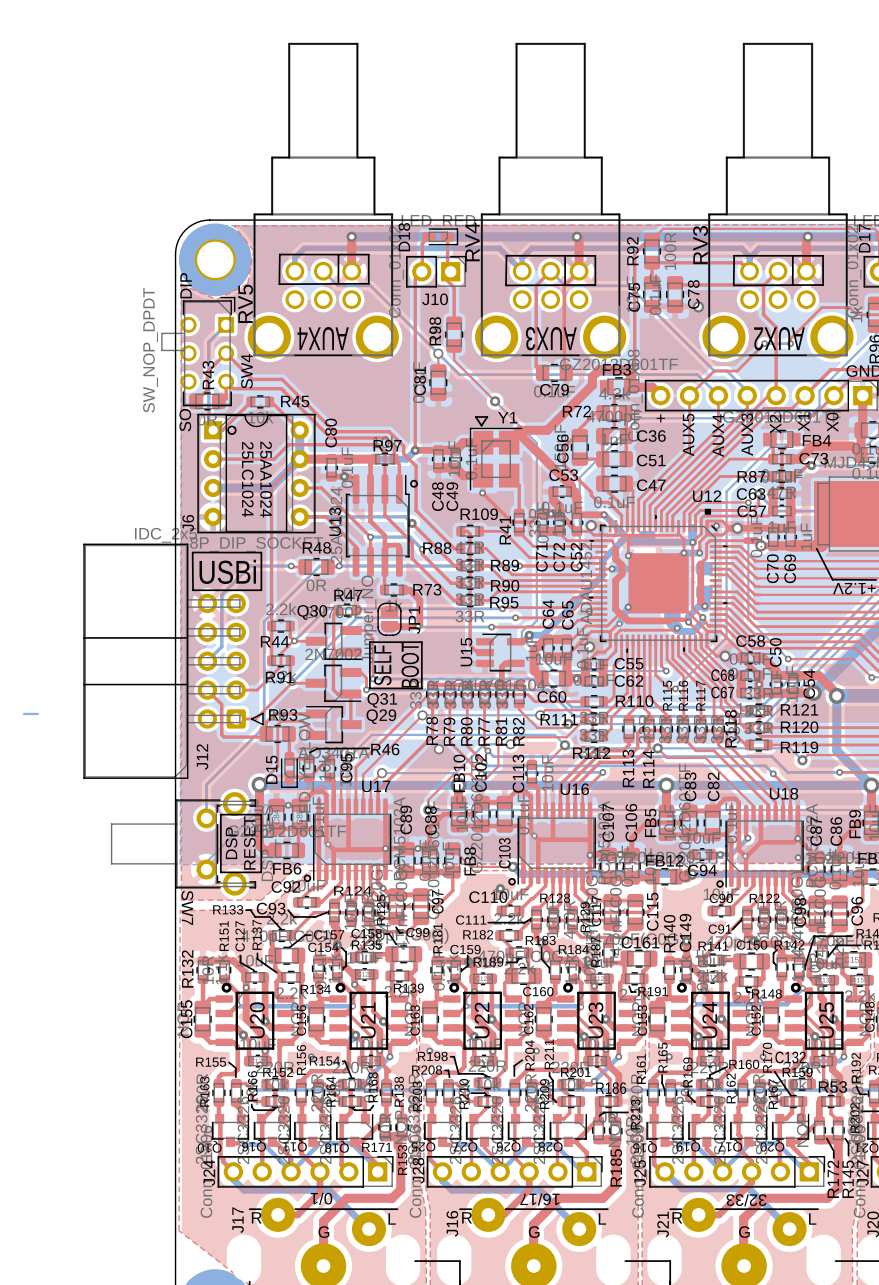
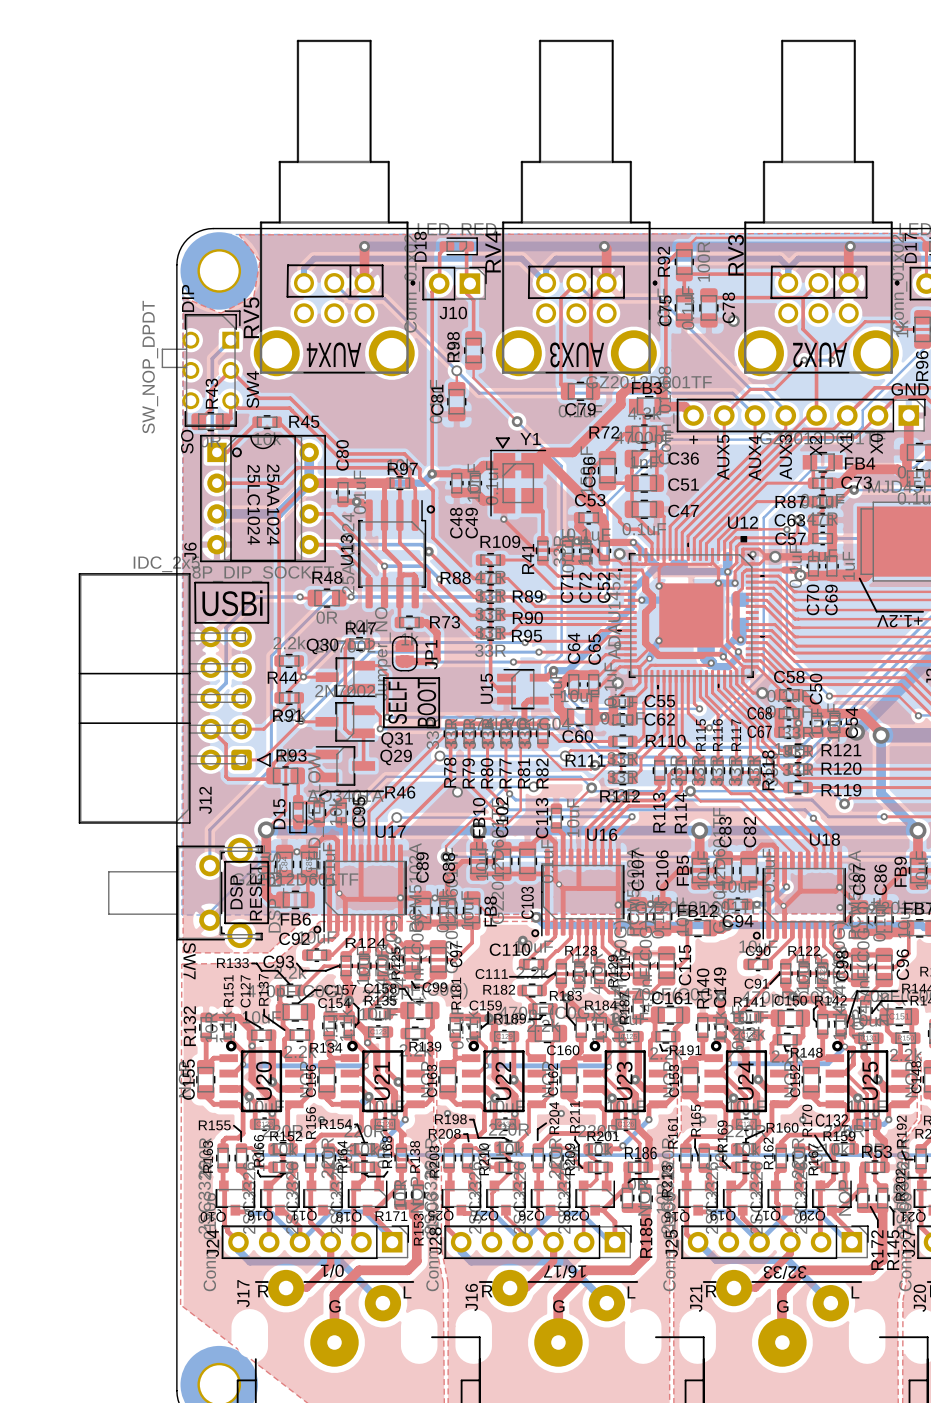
RV5 footprint: [247, 42, 399, 359] -> [253, 39, 416, 377]
RV4 footprint: [475, 42, 627, 359] -> [495, 39, 658, 377]
RV3 footprint: [702, 42, 854, 359] -> [738, 39, 900, 377]
bottom track: (24, 713) (37, 713) -> none

